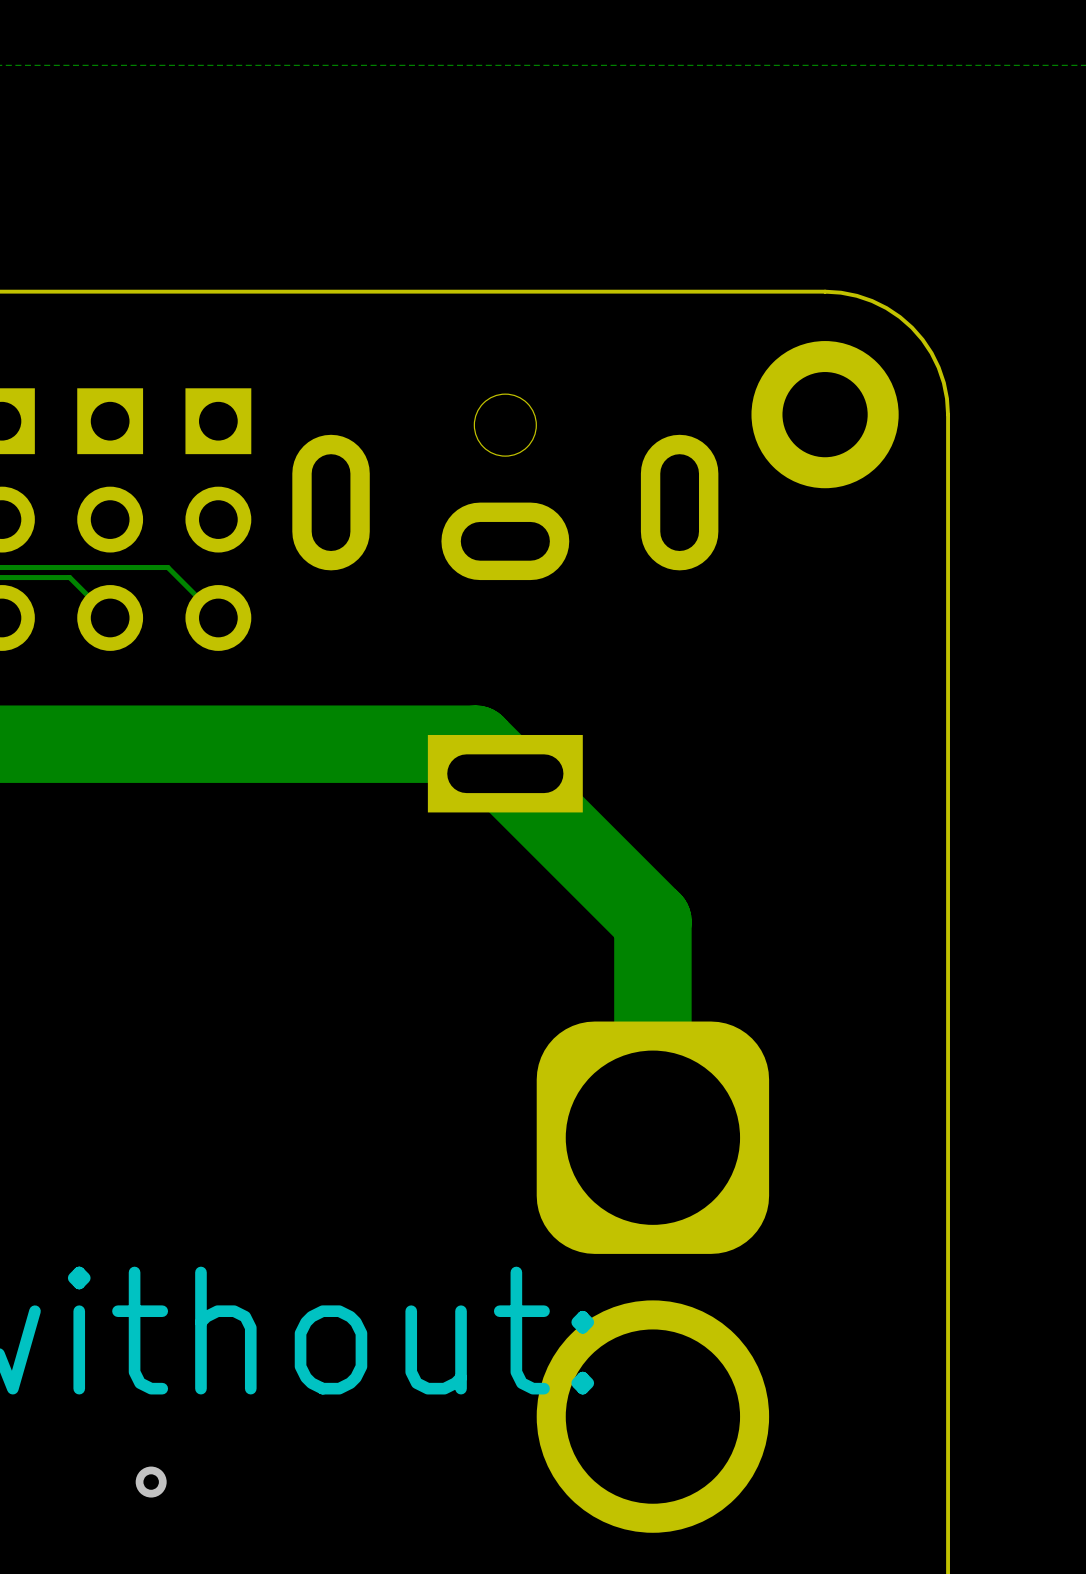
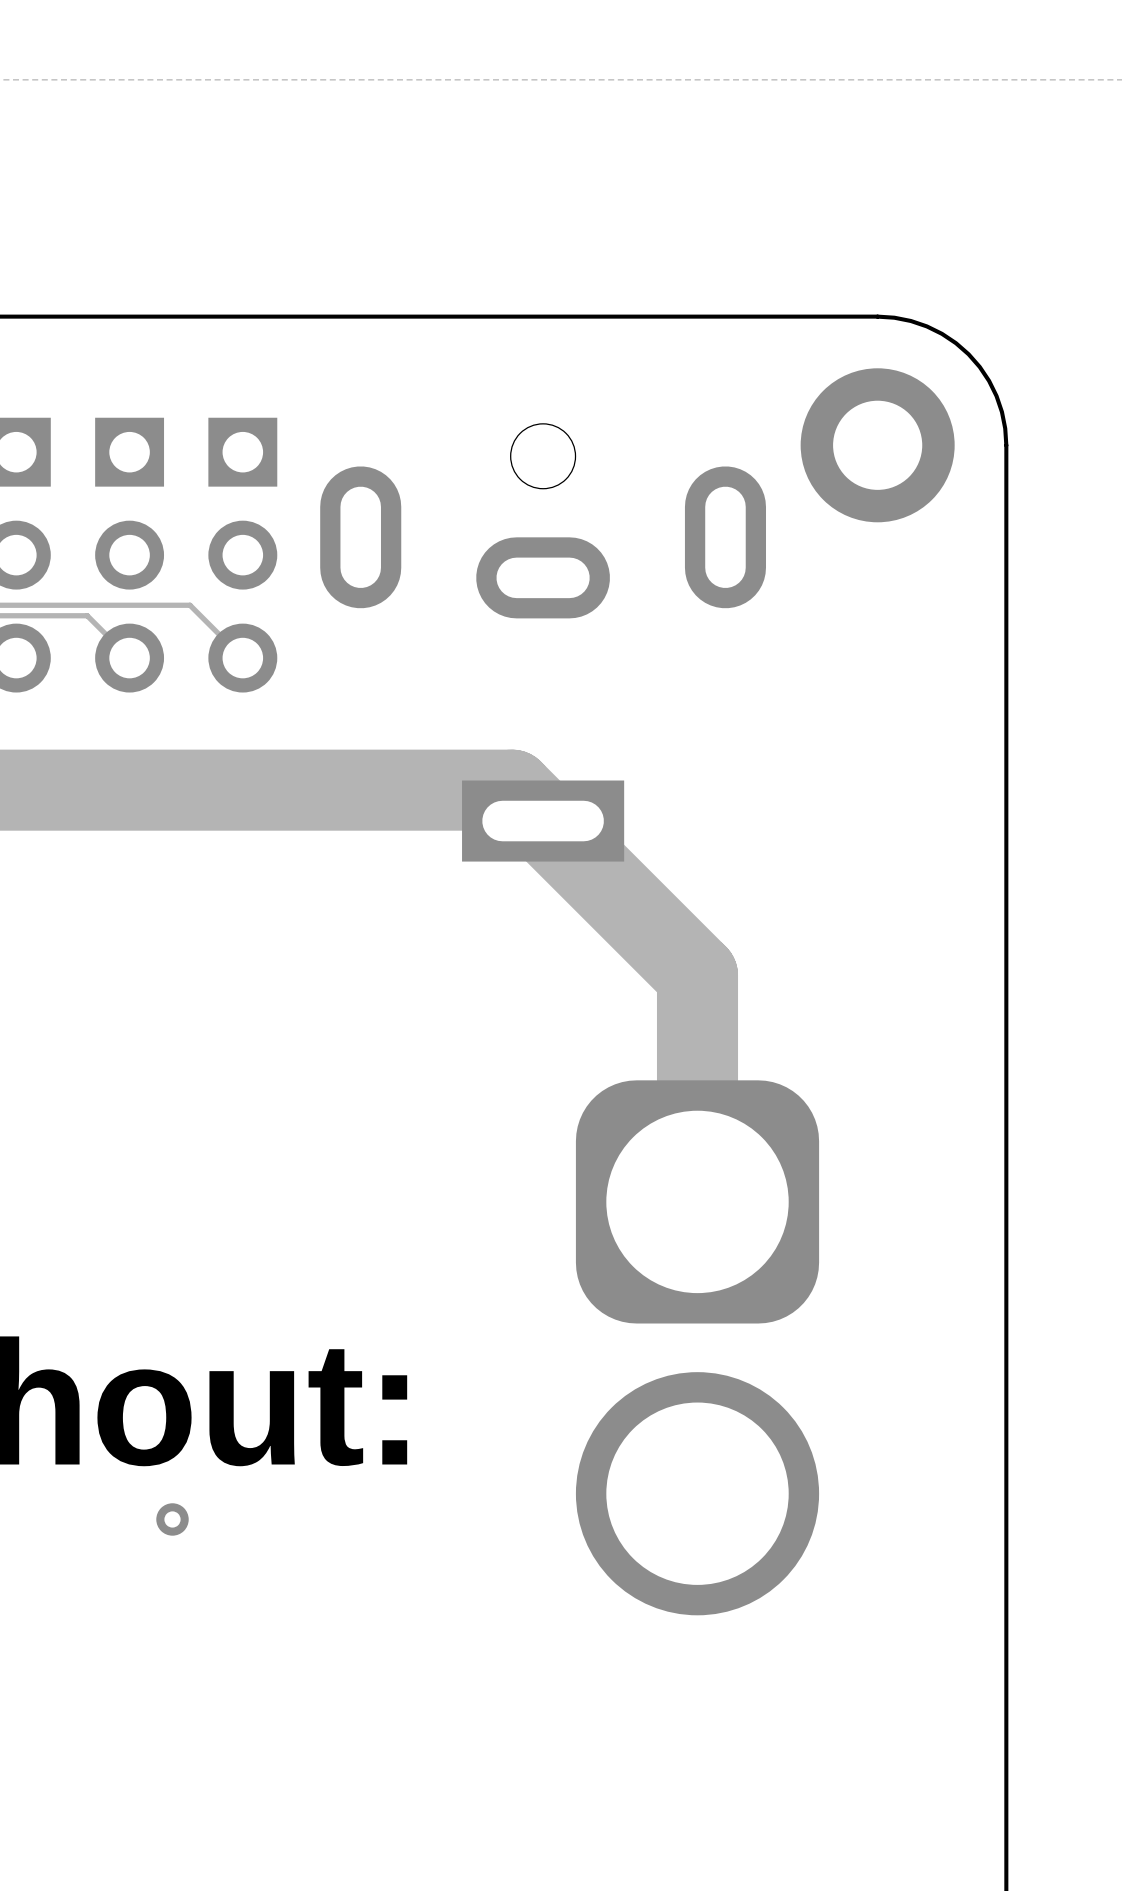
via position: (151, 1482) -> (172, 1519)

